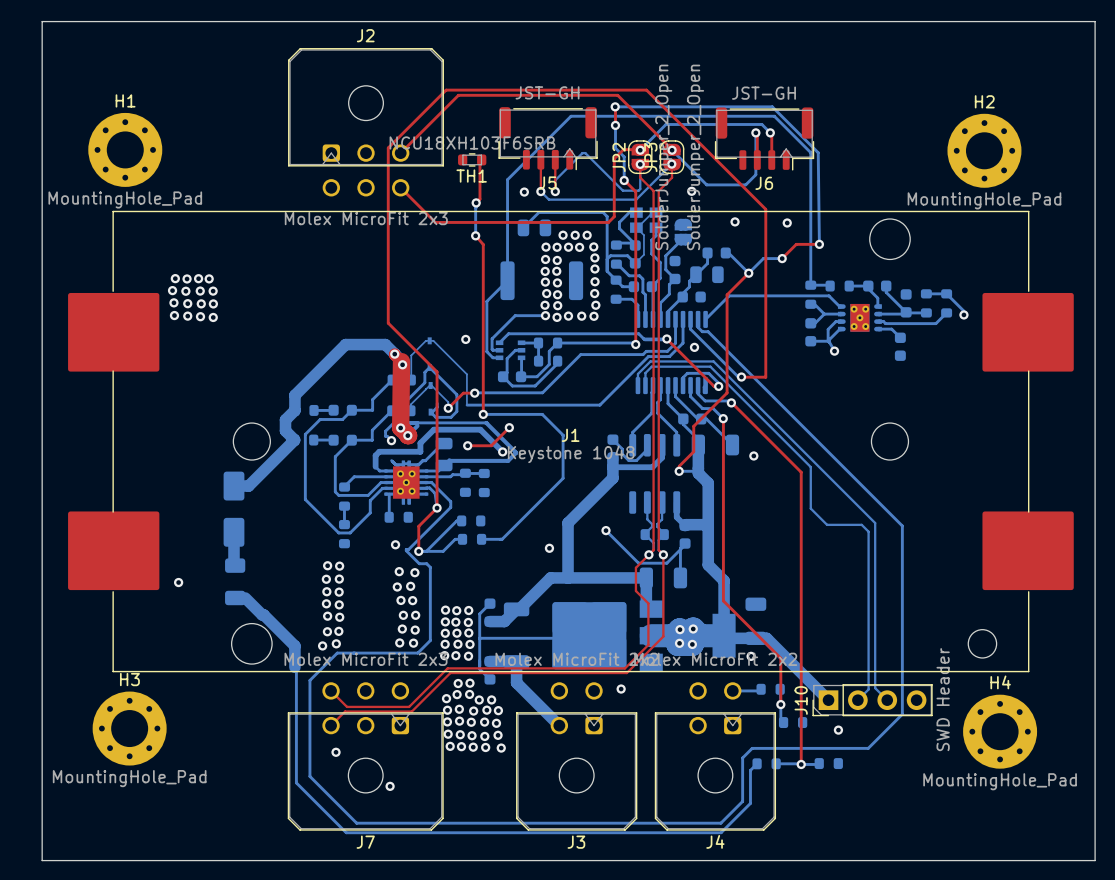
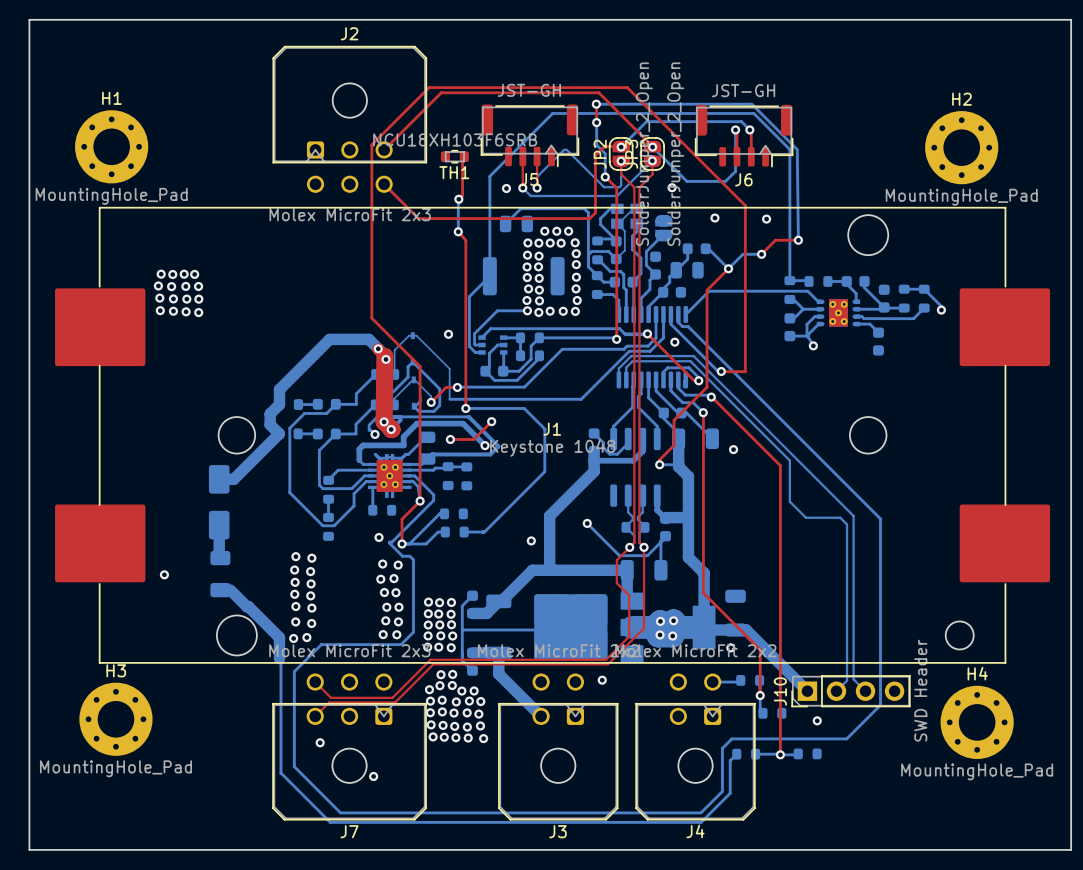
via: none -> (295, 556)
via: (339, 566) -> none
via: none -> (294, 570)
via: (339, 579) -> none
via: none -> (295, 582)
via: (339, 592) -> none
via: none -> (294, 594)
via: (339, 604) -> none
via: none -> (295, 606)
via: (339, 617) -> none
via: none -> (295, 621)
via: (338, 631) -> none
via: (336, 643) -> none
via: none -> (293, 638)

